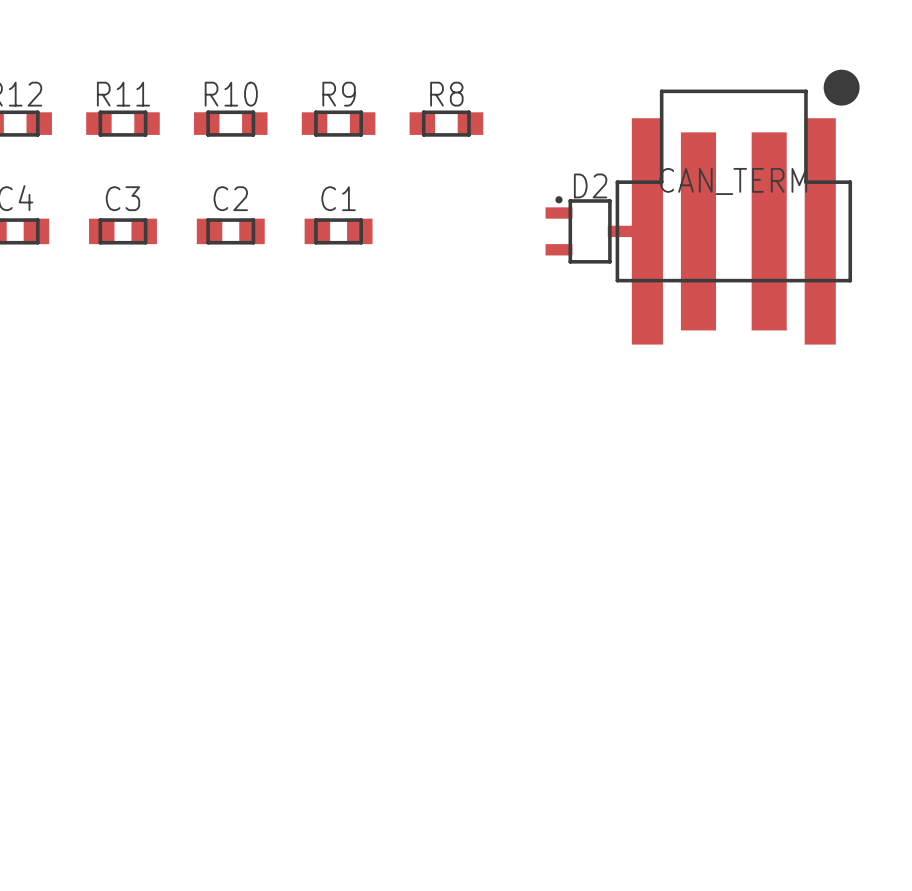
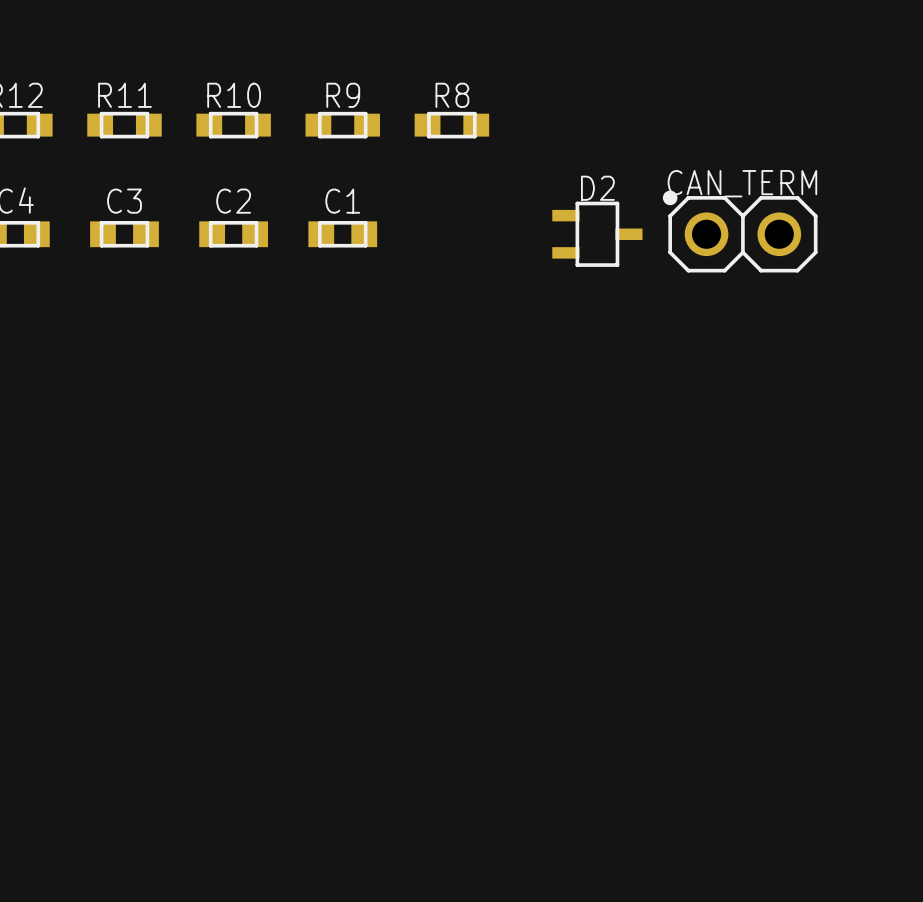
CAN_TERM footprint: [615, 69, 860, 345] -> [662, 190, 818, 273]
D2 footprint: [545, 196, 635, 264] -> [552, 201, 643, 267]

